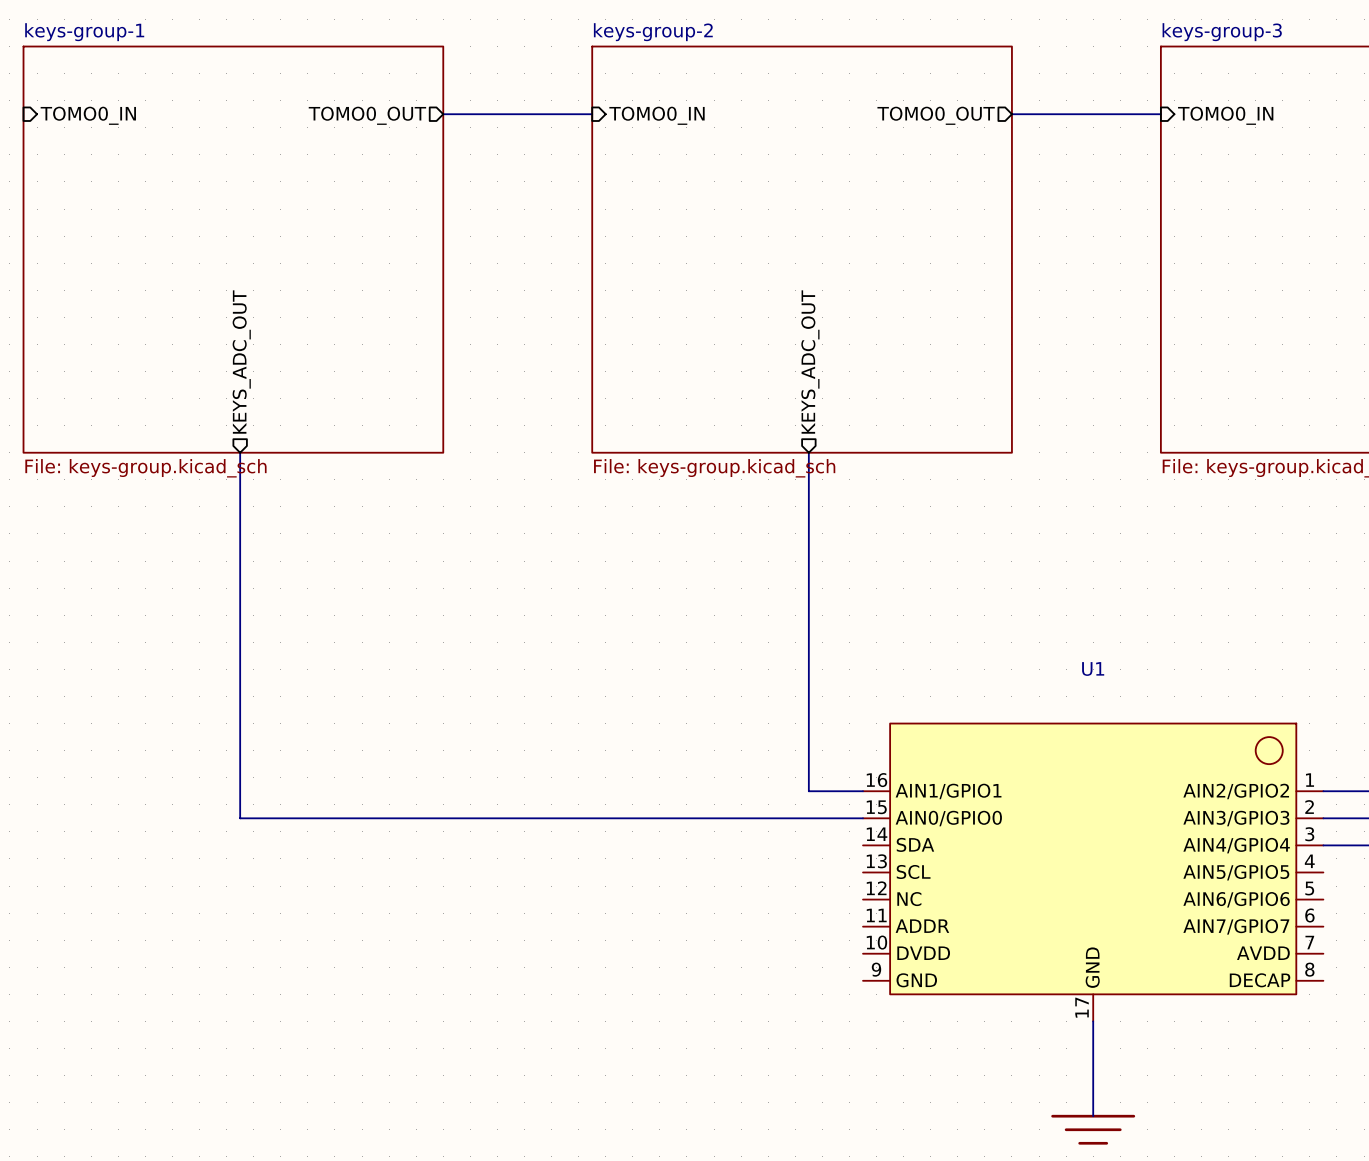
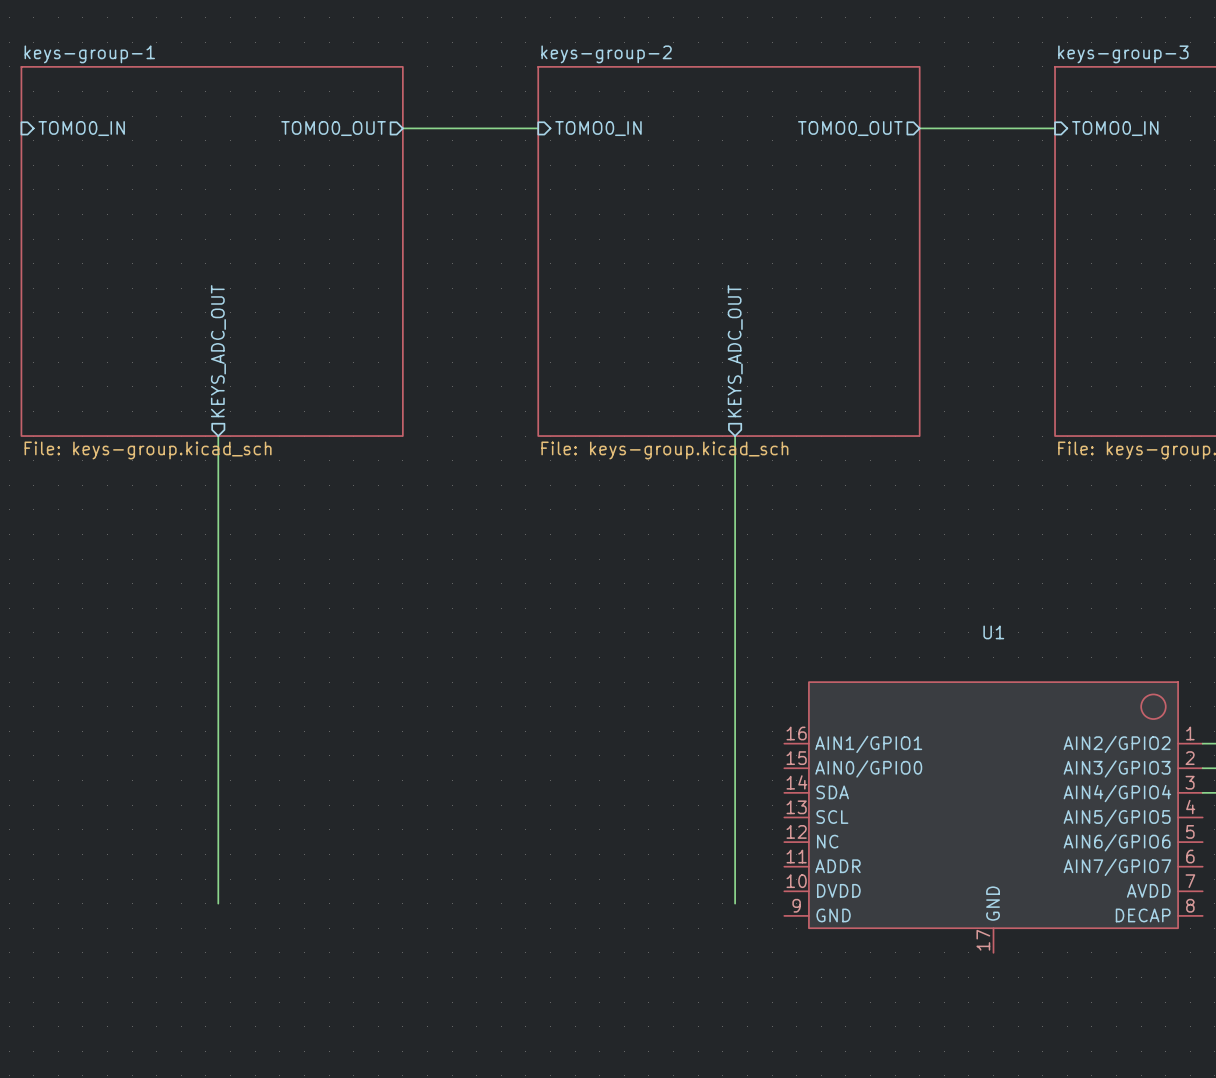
wire: (808, 791) (863, 791) -> (735, 743) (735, 903)
wire: (240, 818) (863, 818) -> (218, 768) (218, 903)
wire: (1093, 1021) (1093, 1116) -> none
power symbol: (1093, 1129) -> none

